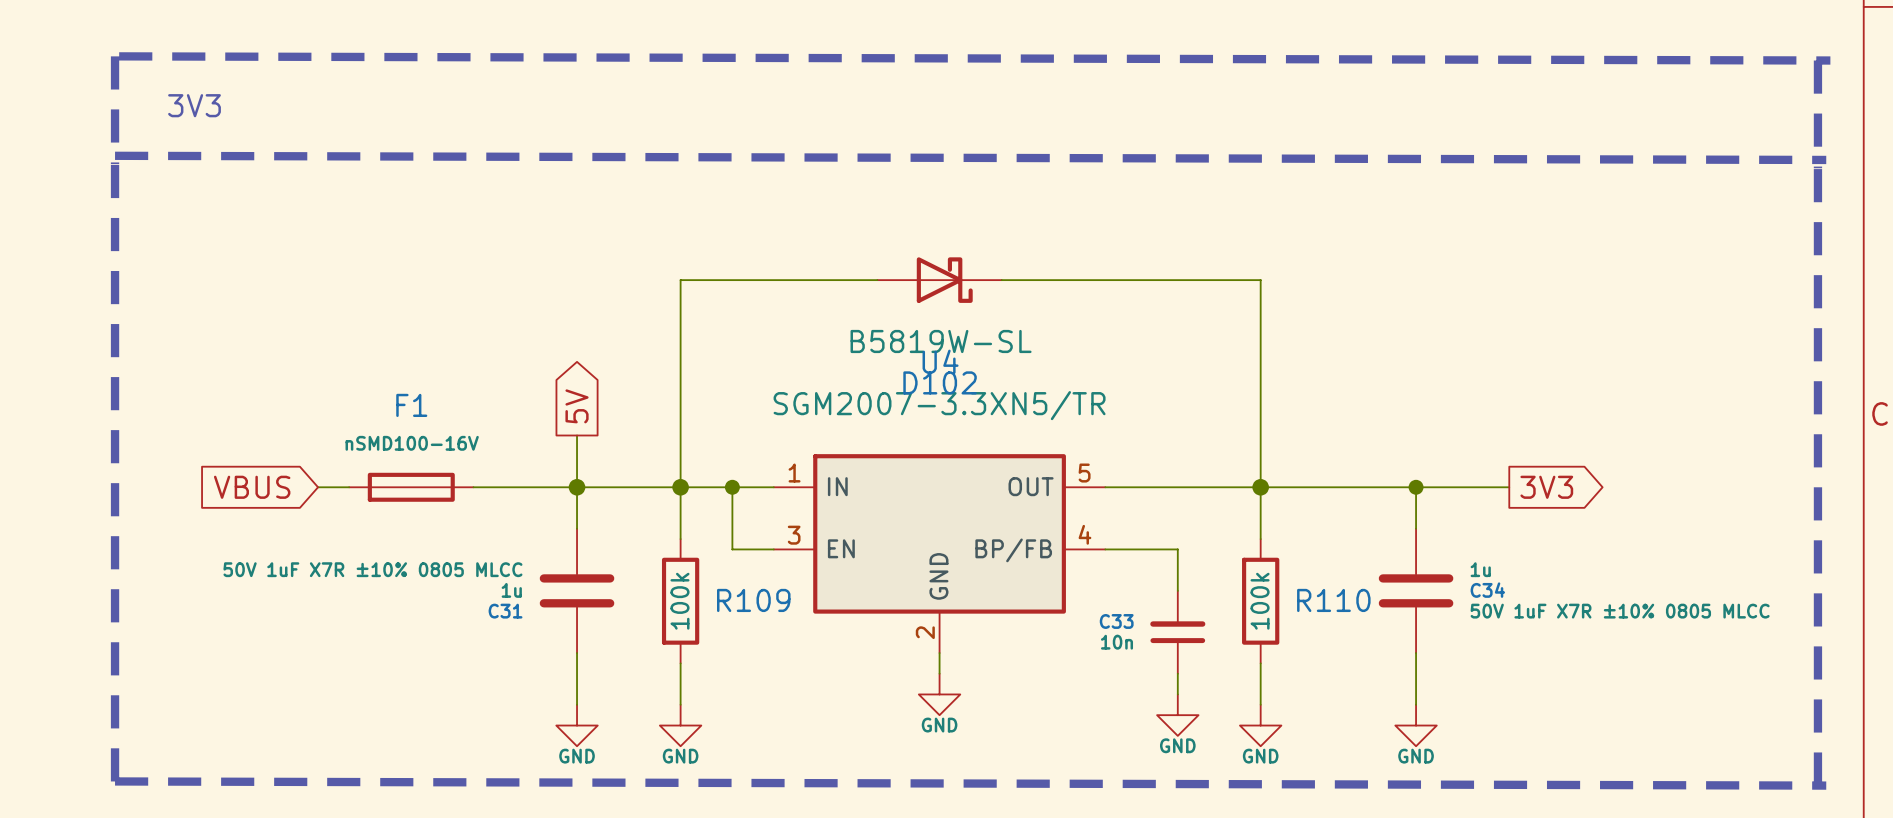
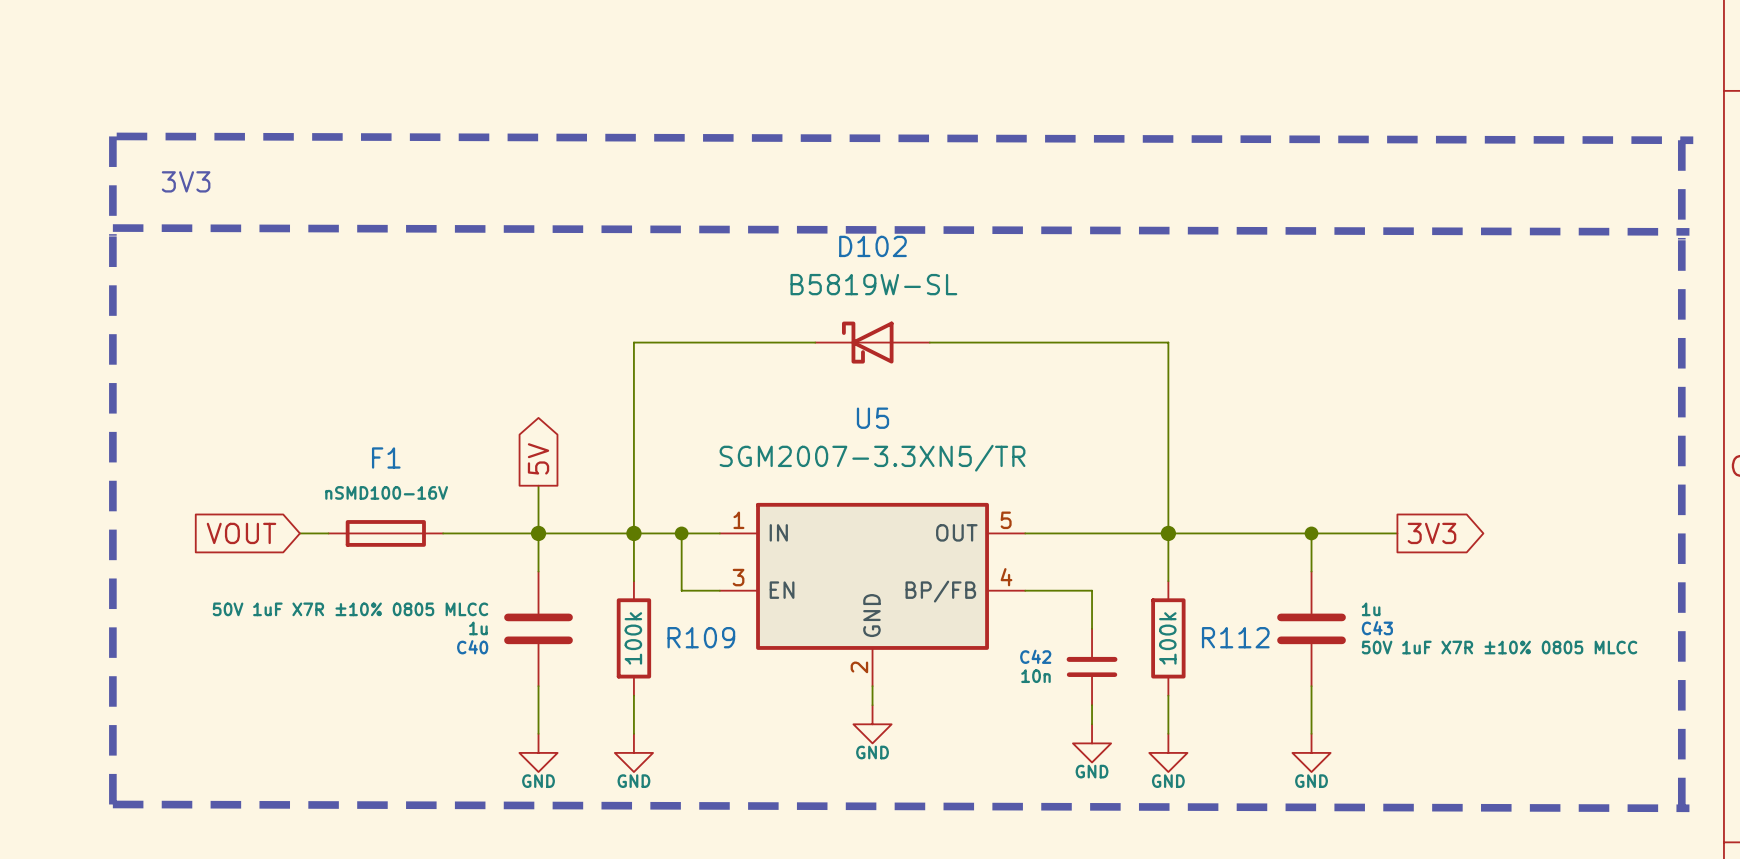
D102 rotation: 0° (944, 280) -> 180° (867, 342)
U4 name: U4 (940, 361) -> U5 (872, 418)
global label: VBUS (252, 487) -> VOUT (241, 533)
C34 name: C34 (1487, 590) -> C43 (1377, 628)
R110 name: R110 (1333, 600) -> R112 (1235, 637)
C31 name: C31 (505, 611) -> C40 (472, 647)
C33 name: C33 (1116, 621) -> C42 (1035, 656)

